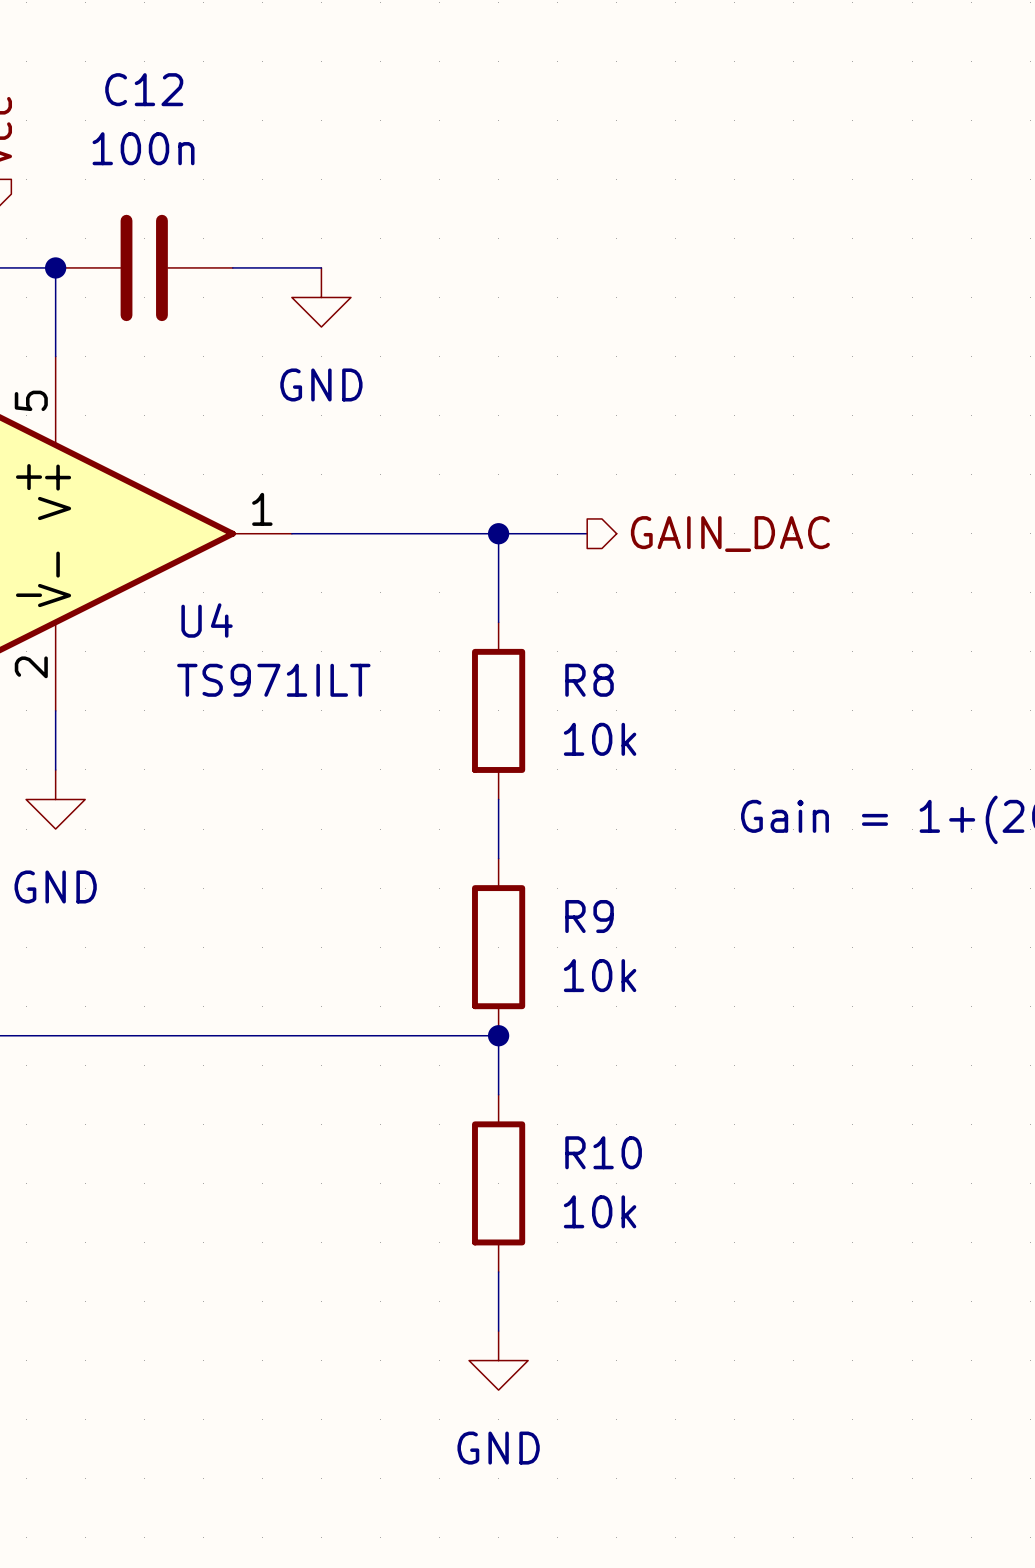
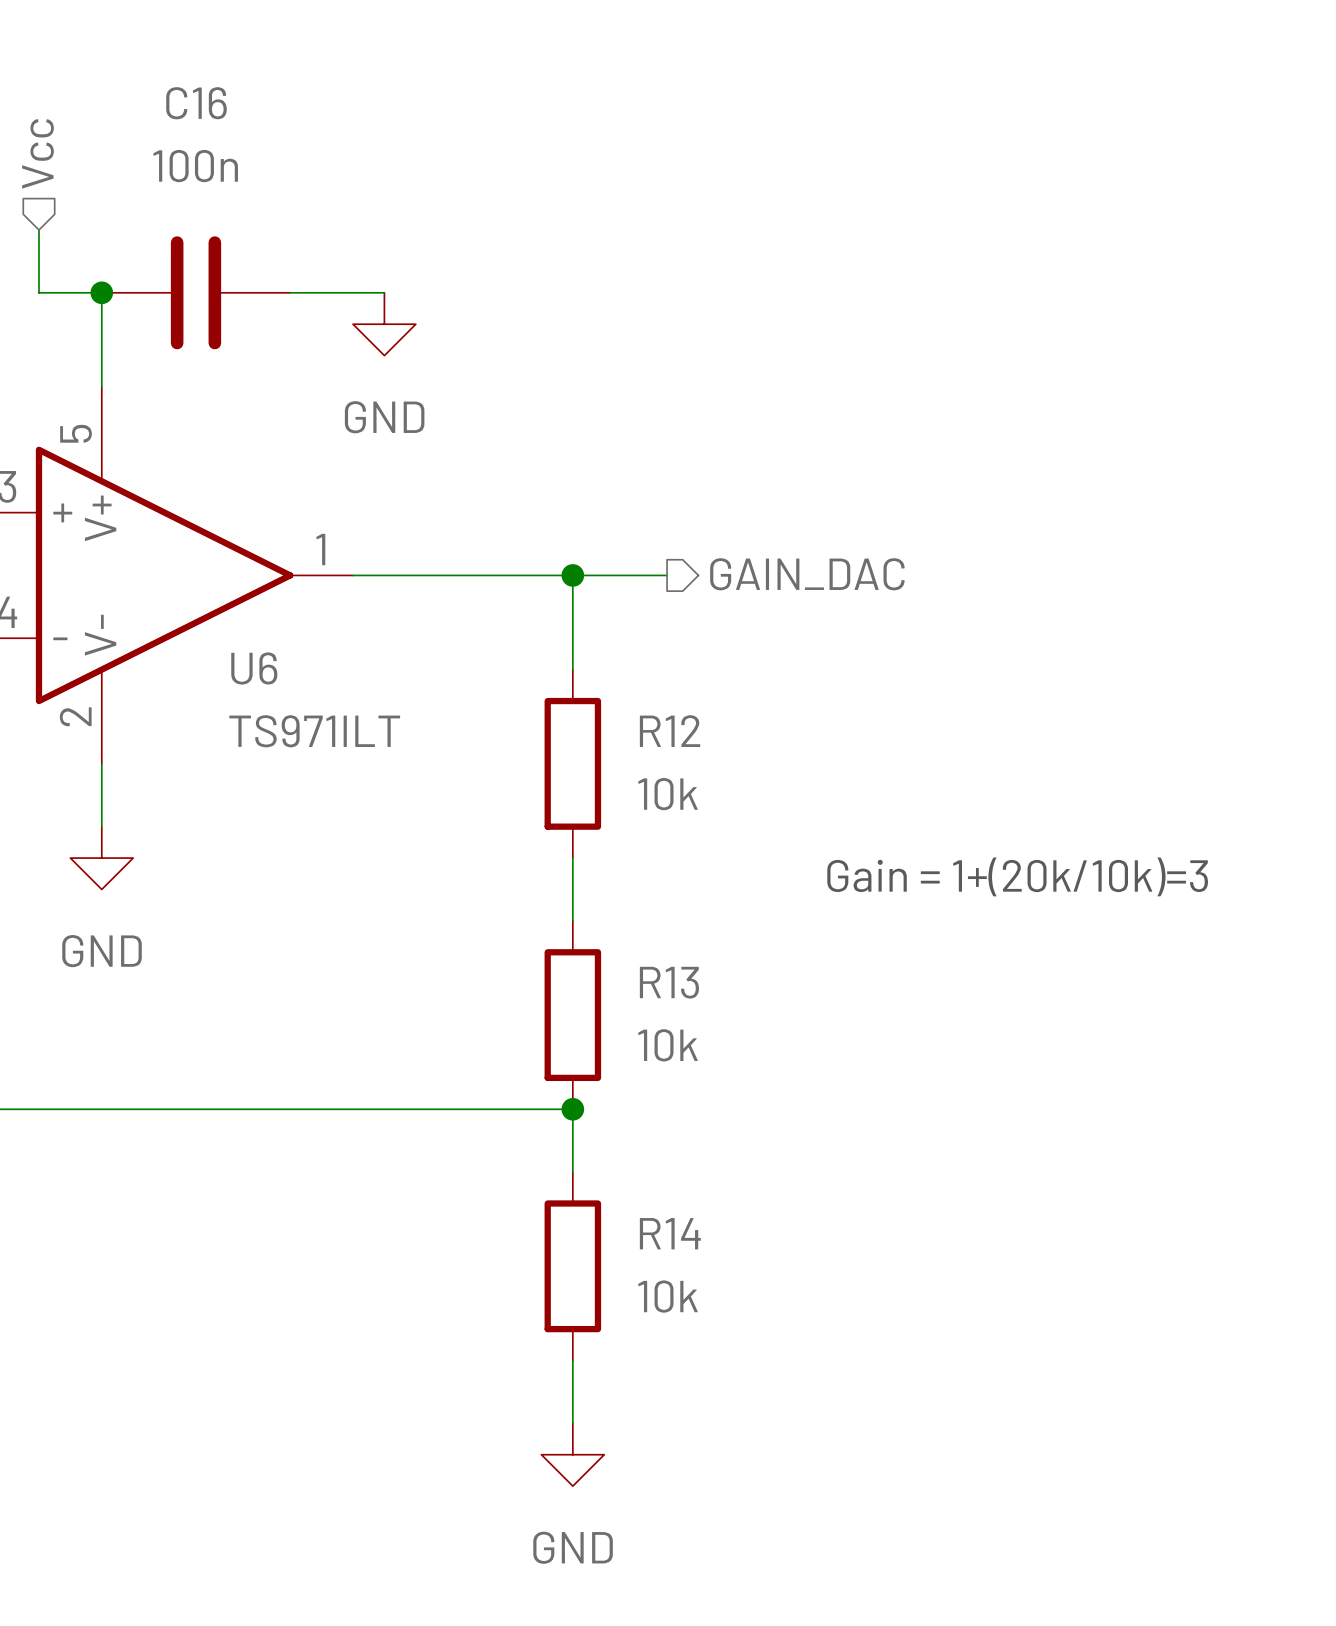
C12 name: C12 (144, 89) -> C16 (196, 103)
U4 name: U4 (207, 620) -> U6 (254, 668)
R8 name: R8 (589, 680) -> R12 (670, 731)
R9 name: R9 (589, 916) -> R13 (669, 982)
R10 name: R10 (603, 1152) -> R14 (670, 1233)

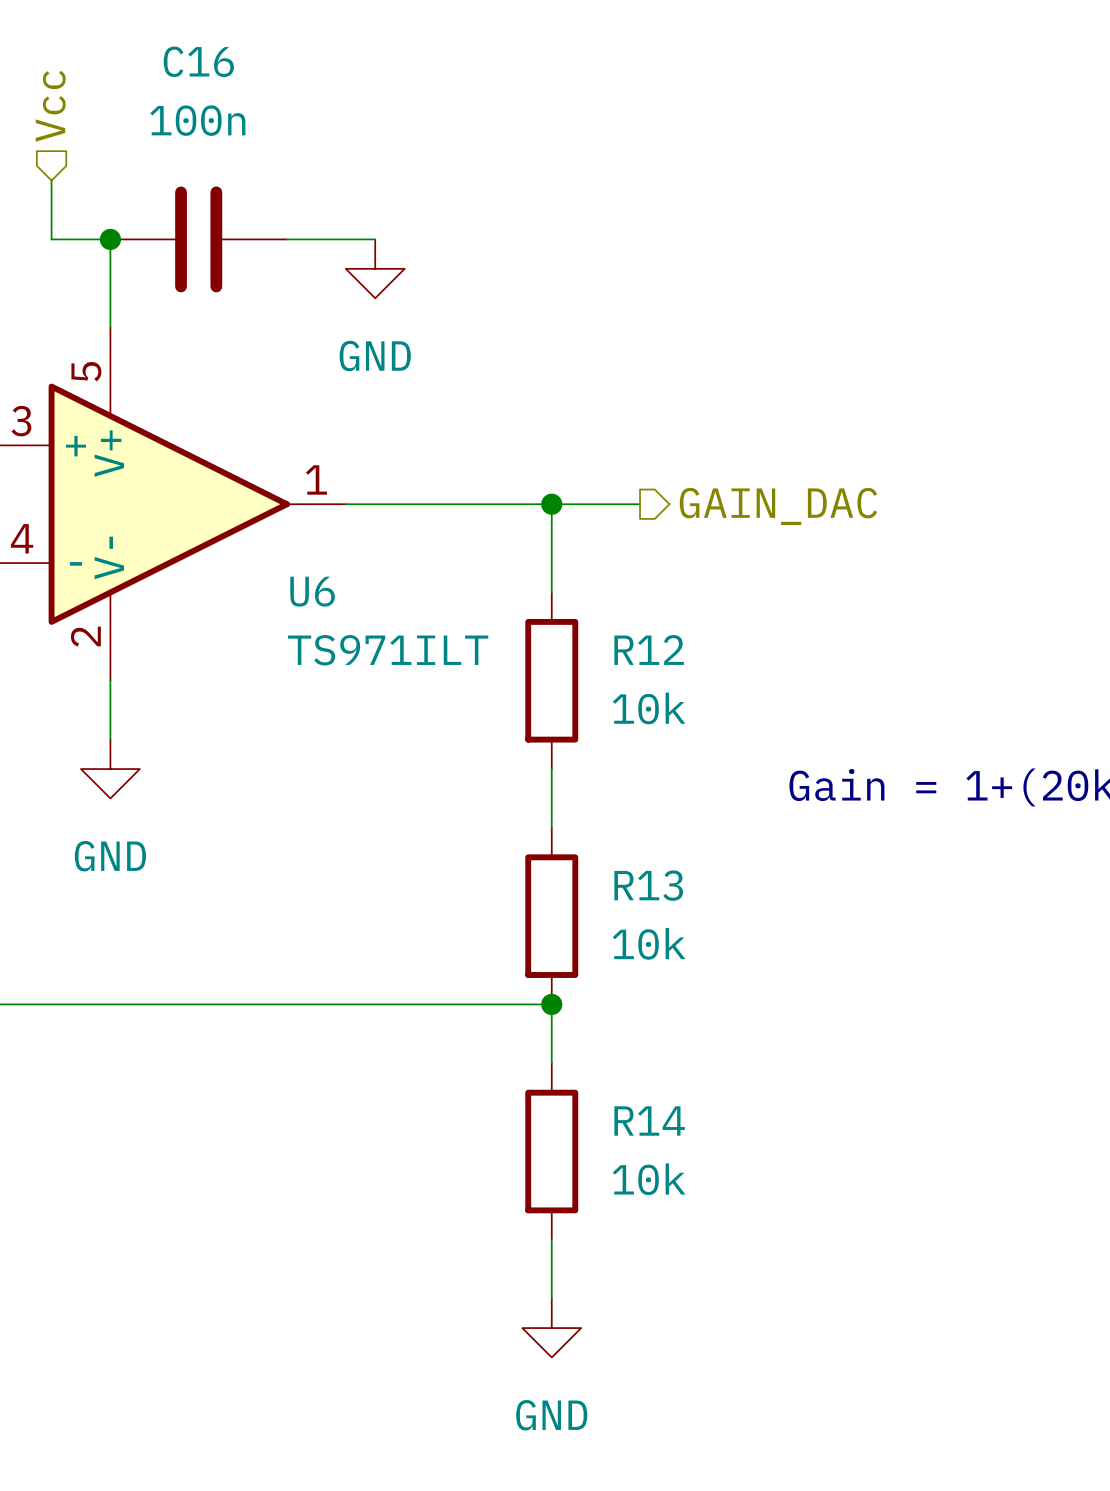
U6 name position: U6 (254, 668) -> U6 (312, 591)
U6 value position: TS971ILT (314, 731) -> TS971ILT (388, 650)

